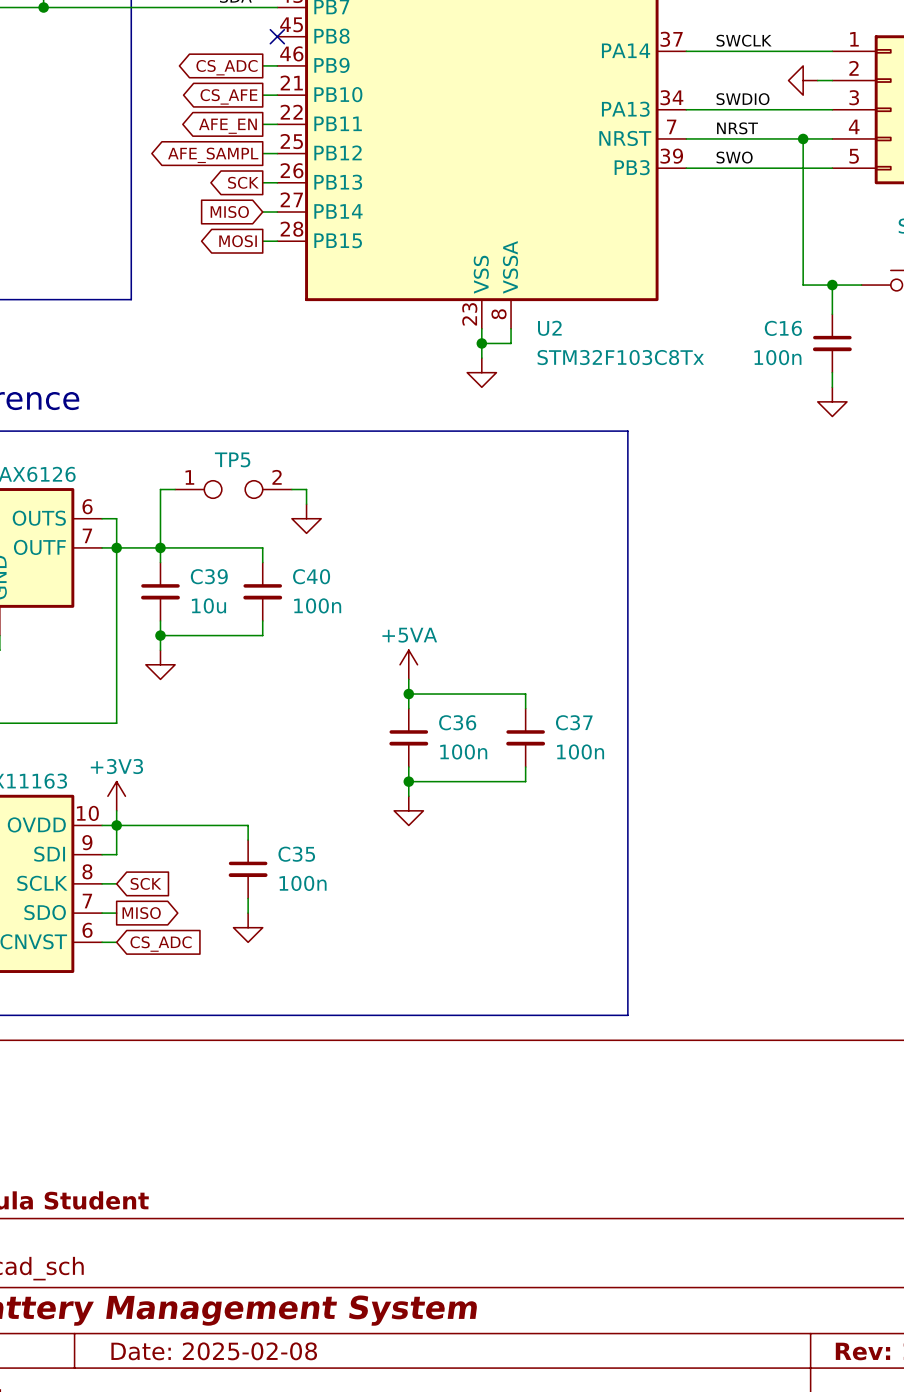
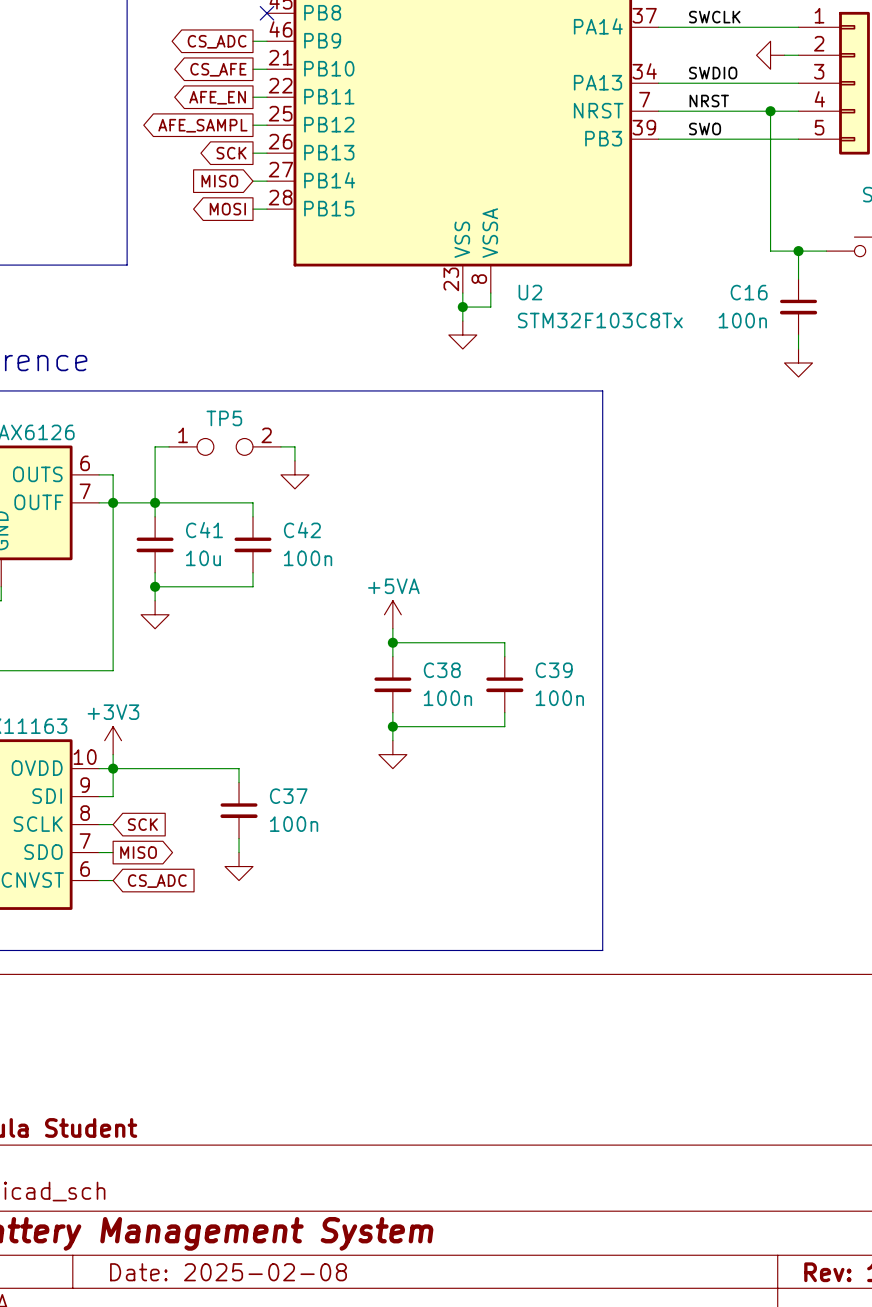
C39 name: C39 (209, 576) -> C41 (204, 530)
C40 name: C40 (311, 576) -> C42 (302, 530)
C36 name: C36 (457, 722) -> C38 (442, 670)
C37 name: C37 (574, 722) -> C39 (554, 670)
C35 name: C35 (296, 854) -> C37 (288, 796)

